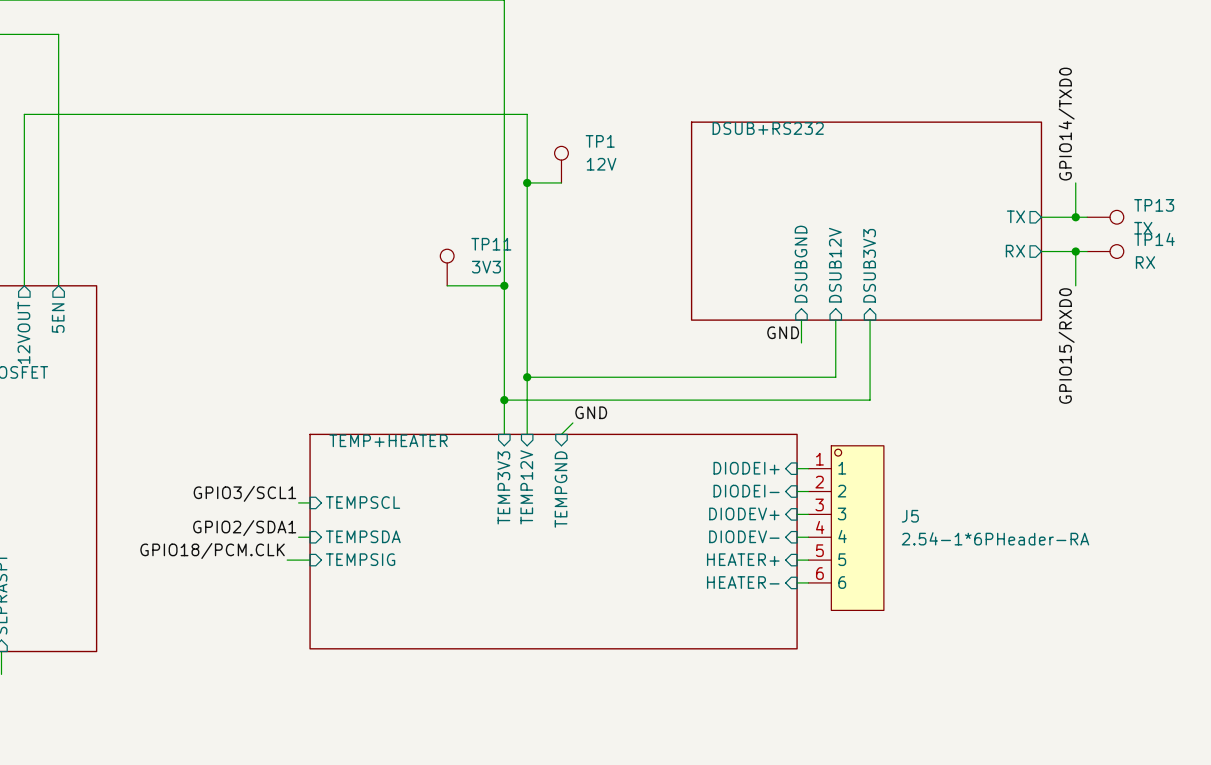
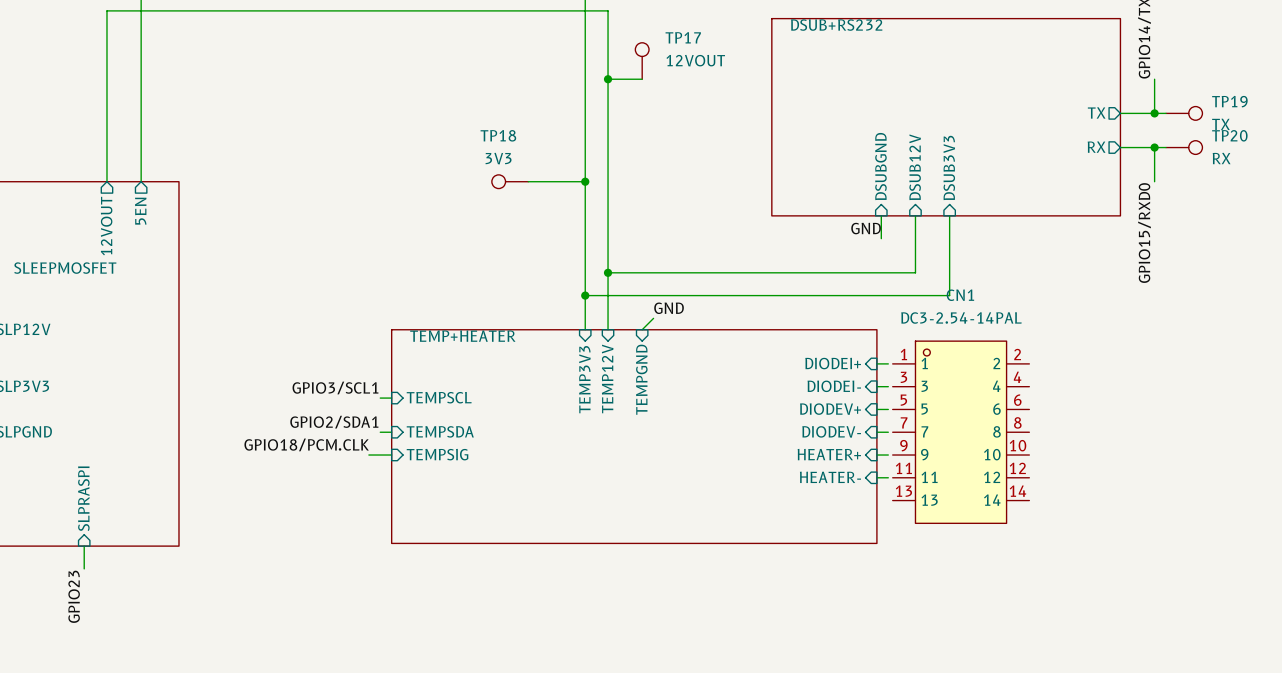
TP1 name: TP1 (600, 141) -> TP17 (683, 37)
TP1 value: 12V (601, 164) -> 12VOUT (695, 60)
TP13 name: TP13 (1154, 205) -> TP19 (1229, 101)
TP14 name: TP14 (1154, 239) -> TP20 (1229, 135)
TP11: 3V3 (447, 267) -> none
TP18: none -> 3V3 (510, 181)
J5: 2.54-1*6PHeader-RA (846, 528) -> none
CN1: none -> DC3-2.54-14PAL (961, 432)

